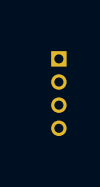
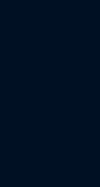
part: (58, 93) -> none

